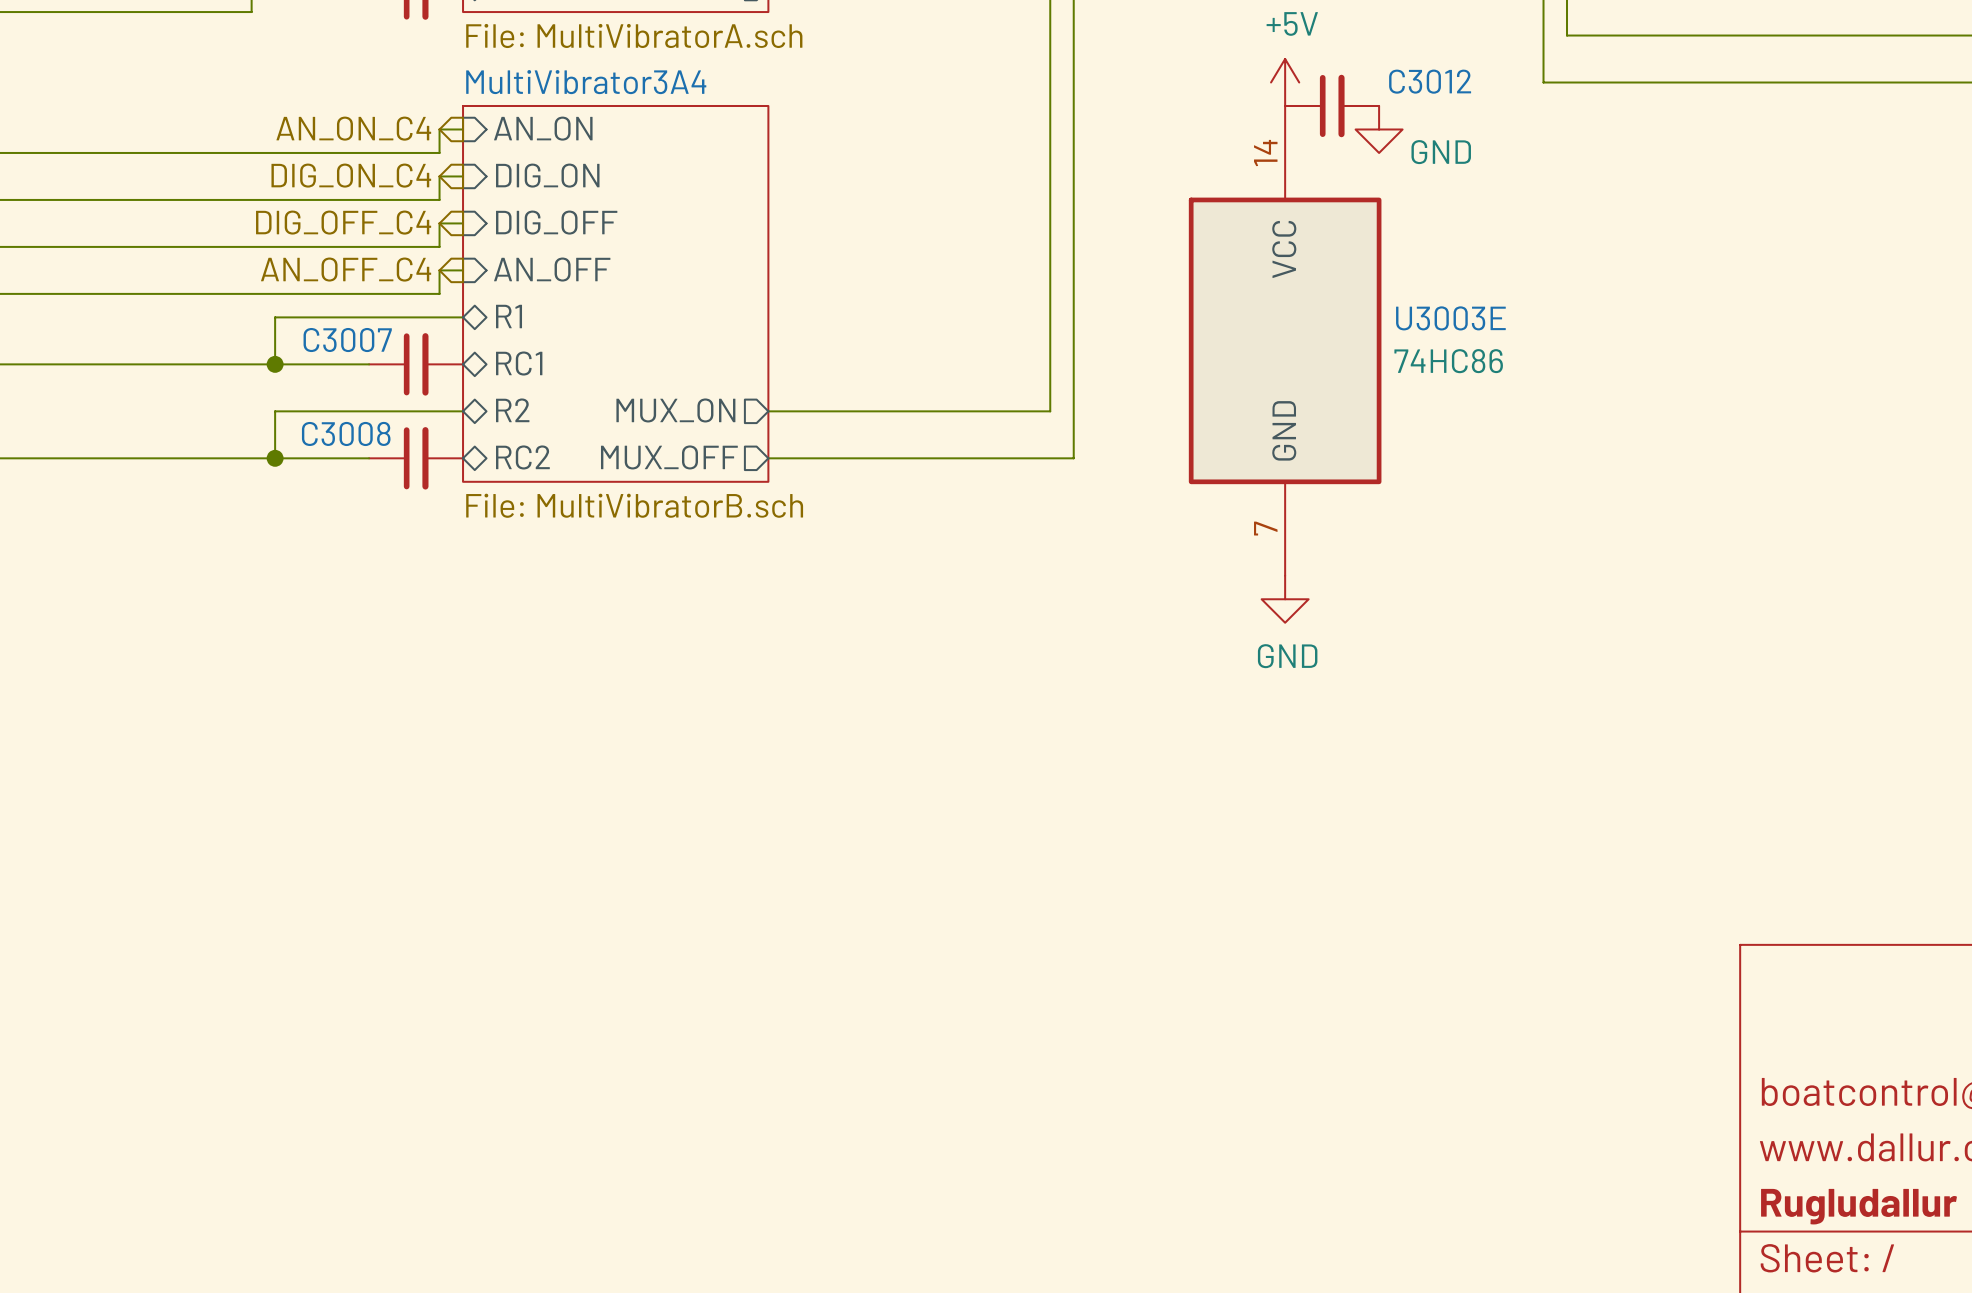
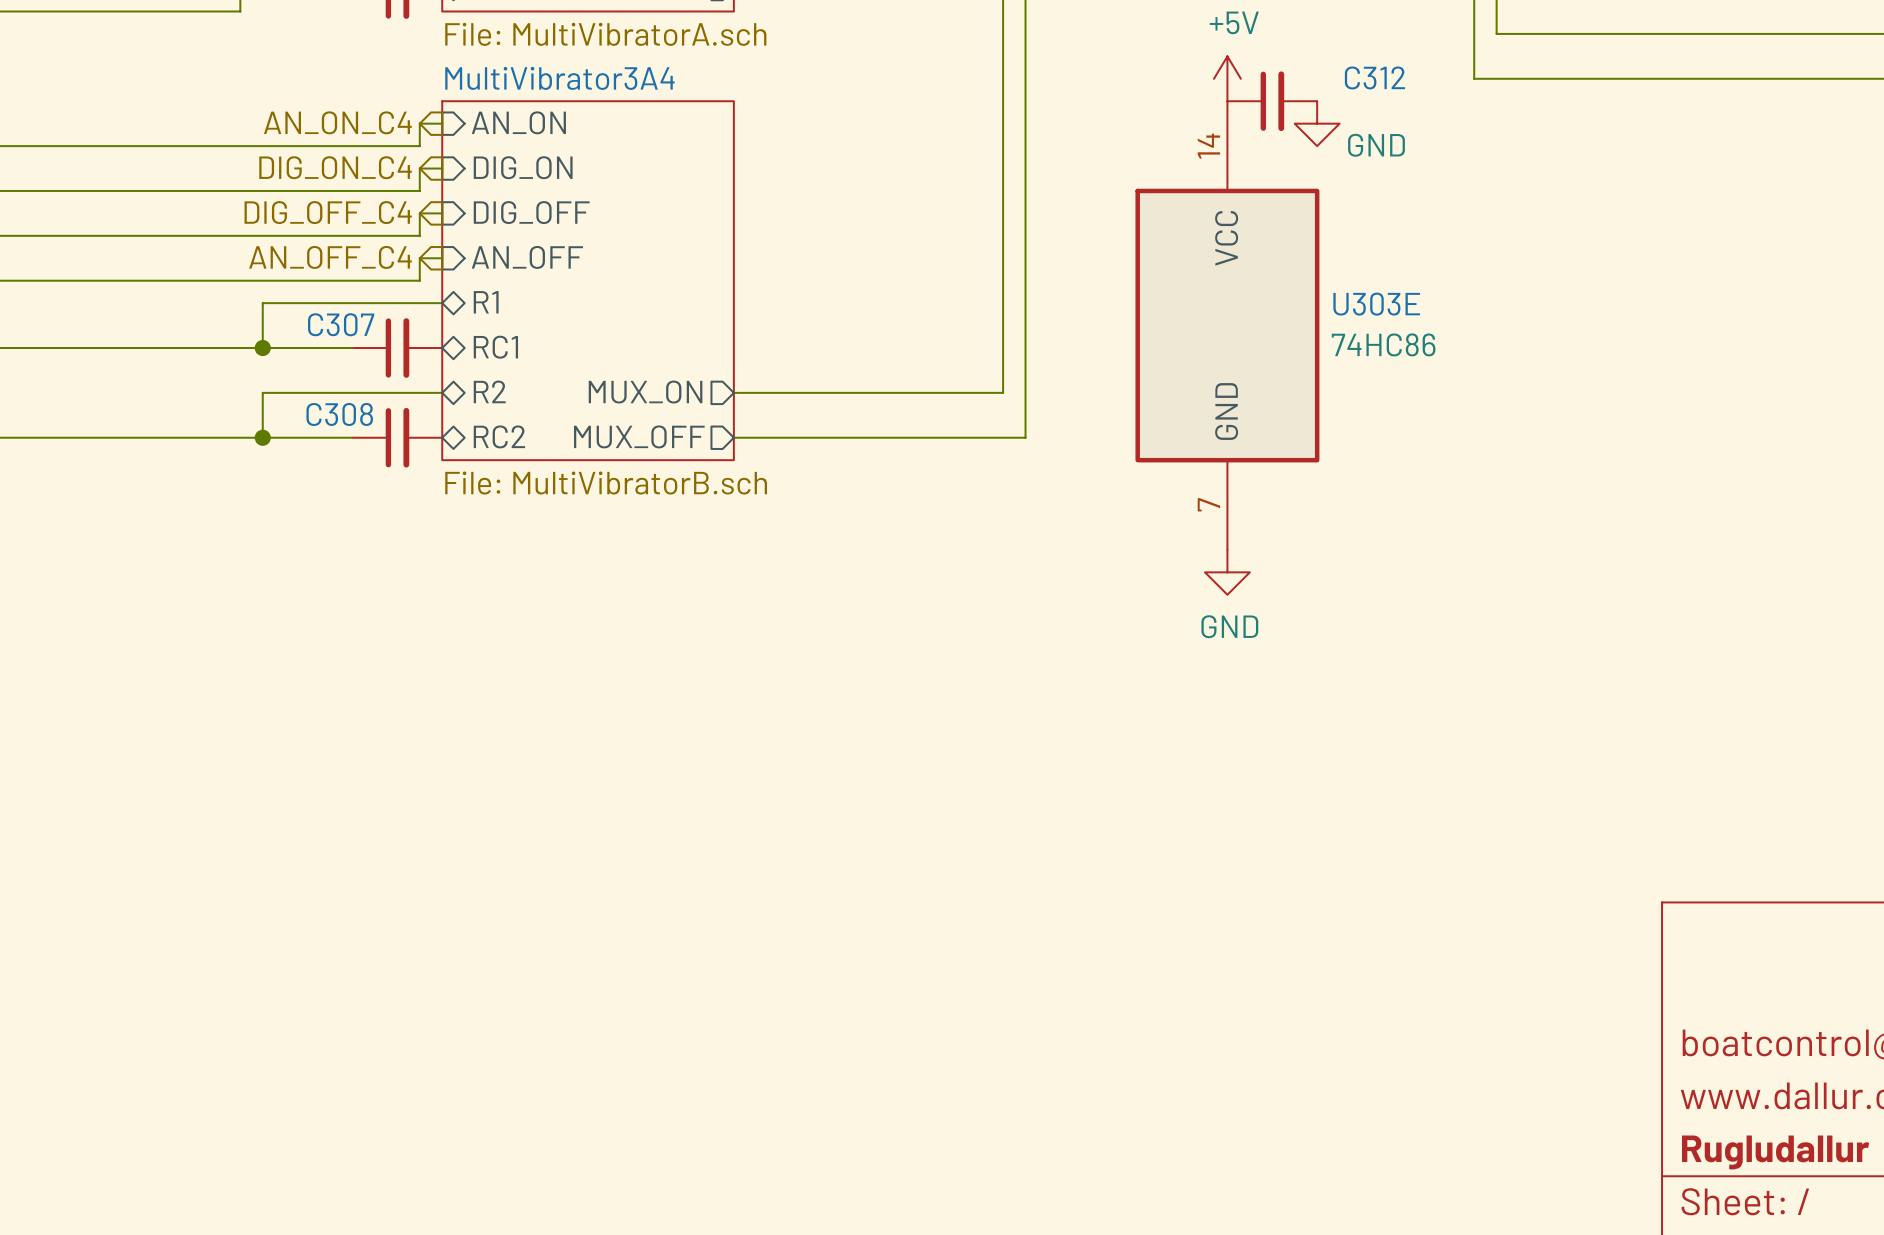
C3012 name: C3012 (1430, 81) -> C312 (1374, 77)
U3003E name: U3003E (1450, 318) -> U303E (1376, 304)
C3007 name: C3007 (347, 340) -> C307 (341, 324)
C3008 name: C3008 (346, 433) -> C308 (339, 414)

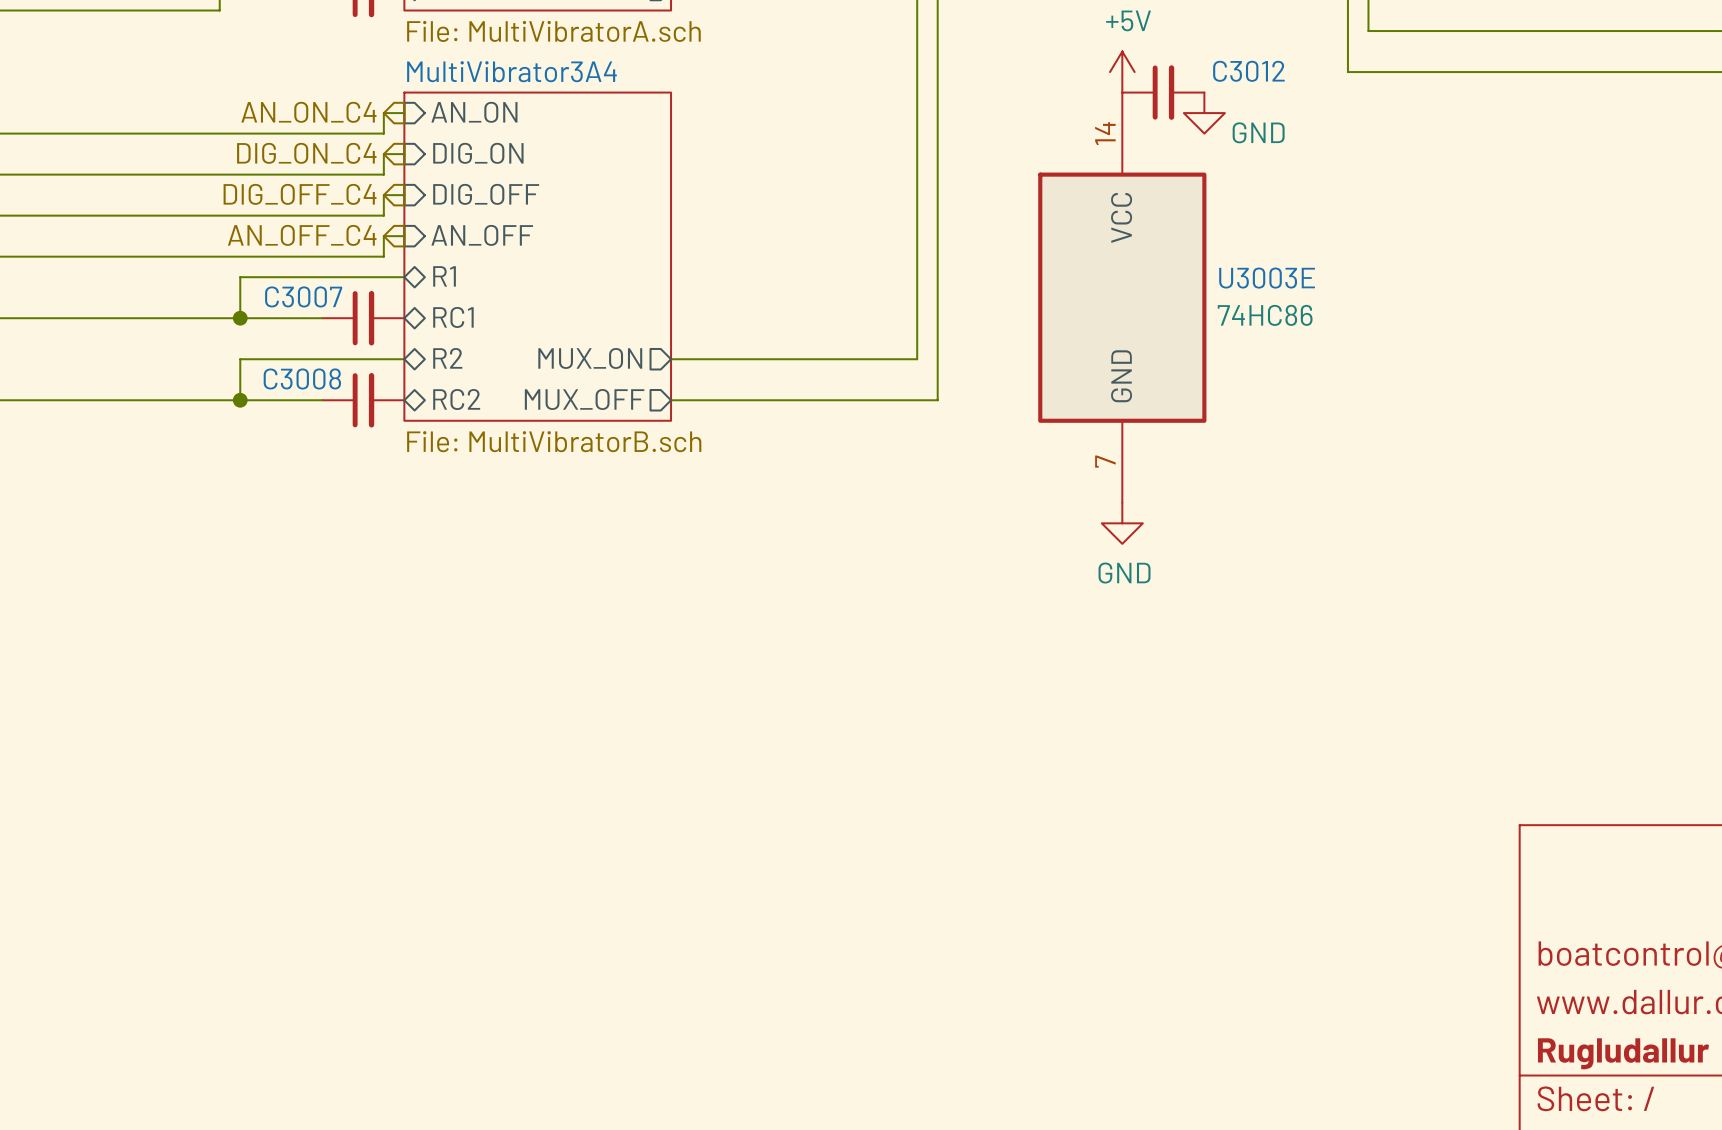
C312 name: C312 (1374, 77) -> C3012 (1248, 71)
U303E name: U303E (1376, 304) -> U3003E (1267, 278)
C307 name: C307 (341, 324) -> C3007 (303, 296)
C308 name: C308 (339, 414) -> C3008 (302, 378)

